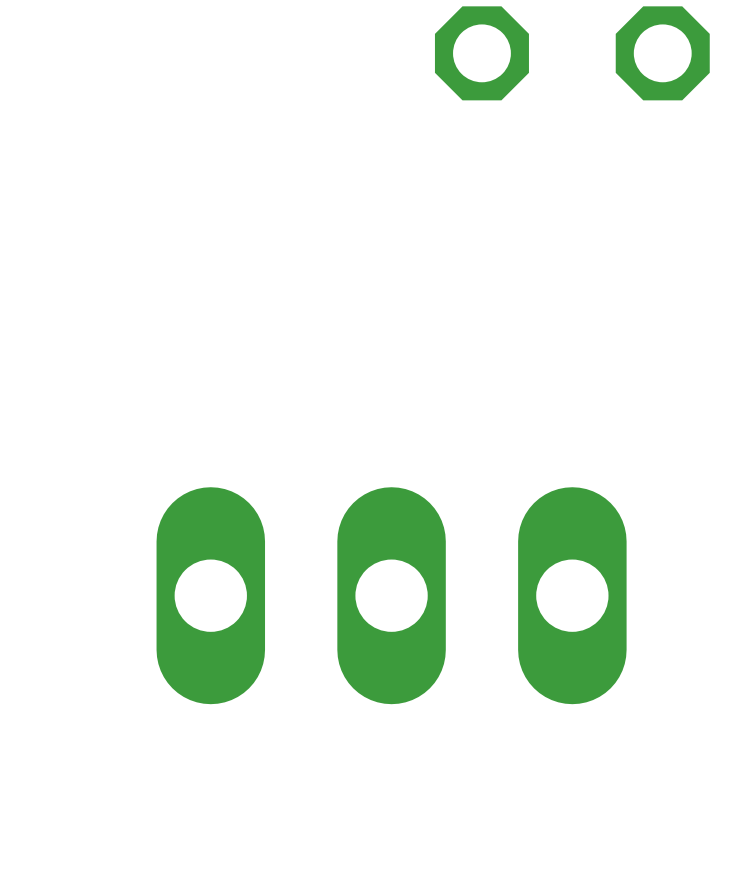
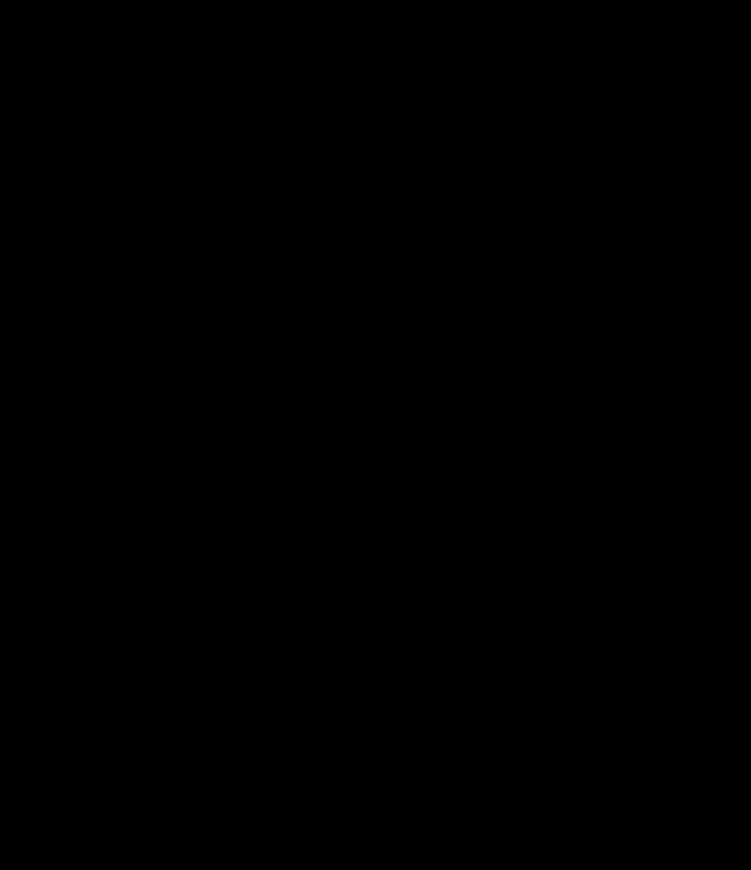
part: (572, 53) -> none
part: (391, 595) -> none

